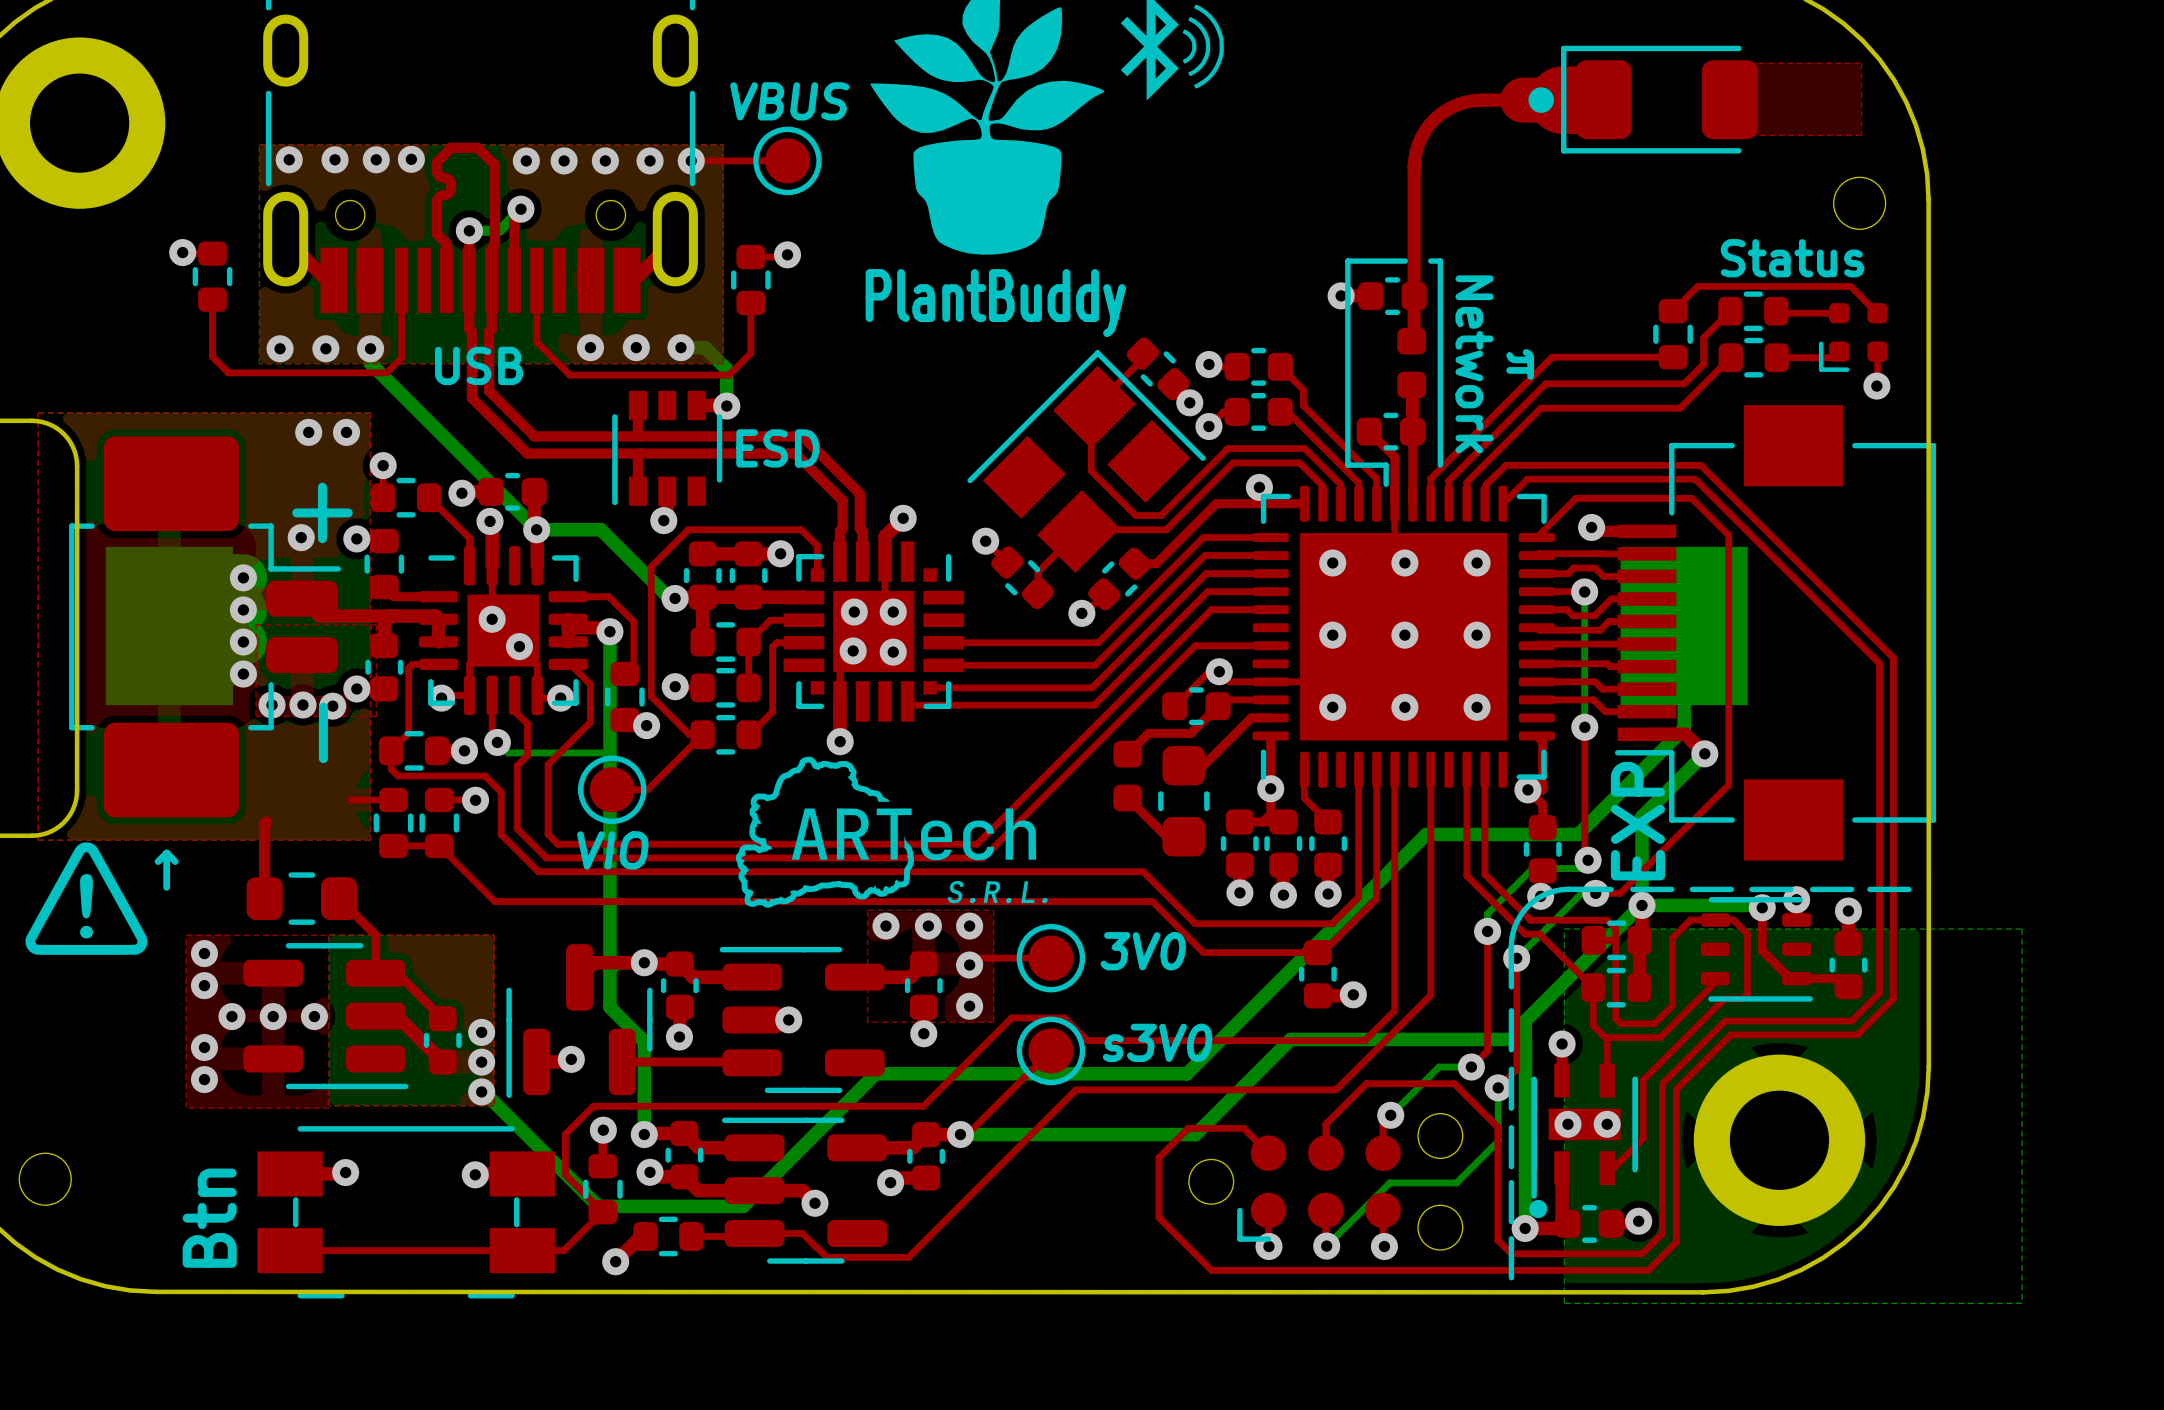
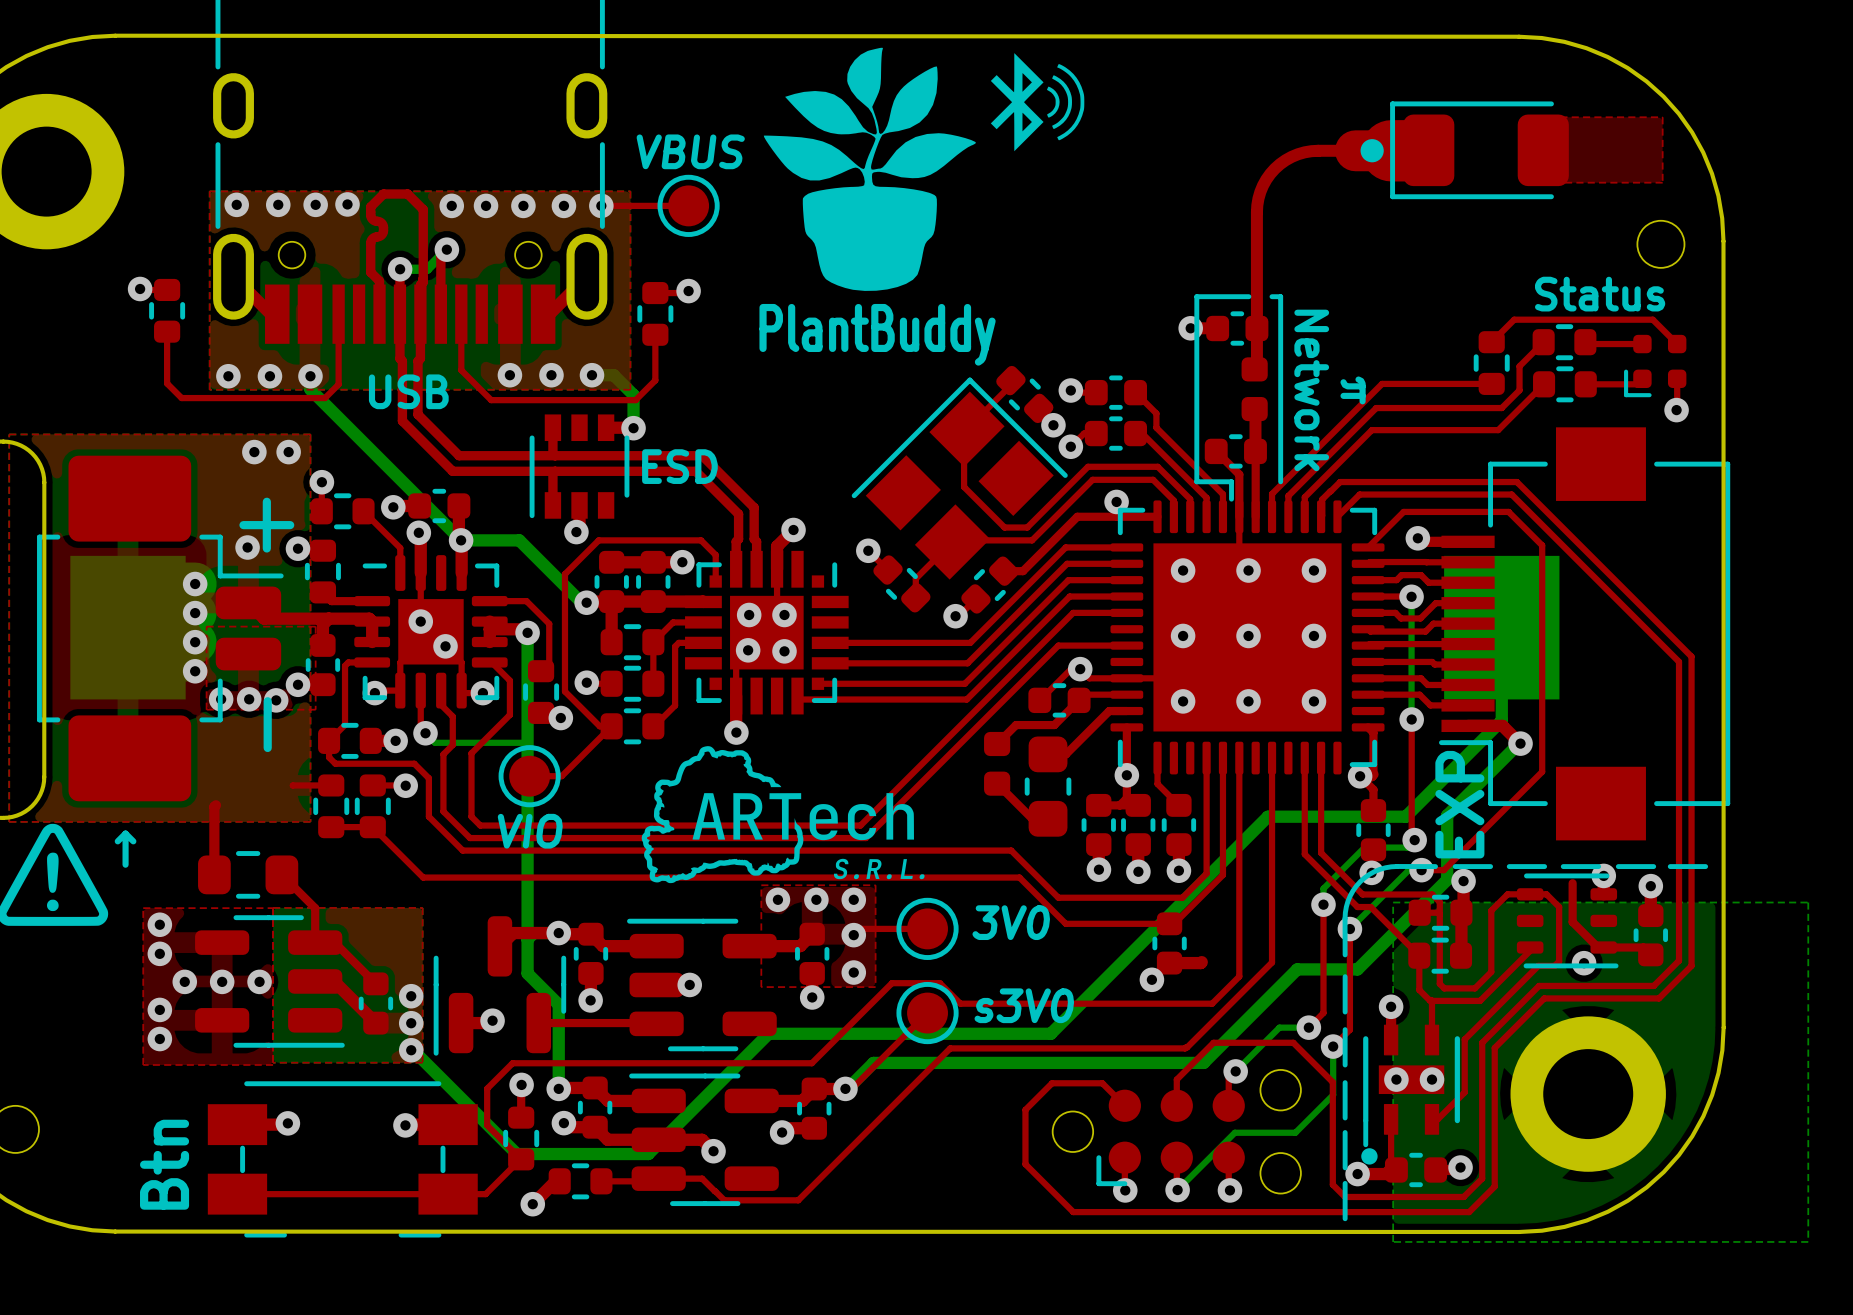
bottom track: (1704, 753) (1641, 816) (1641, 905) -> none
bottom track: (1762, 907) (1759, 905) (1640, 905) (1525, 1021) (1525, 1039) (1290, 1039) (1195, 1134) (960, 1134) -> (1519, 742) (1447, 815) (1447, 879) (1357, 969) (1297, 969) (1203, 1062) (873, 1062) (846, 1089)
via position: (1762, 907) -> (1584, 963)
via position: (1353, 994) -> (1151, 979)
bottom track: (1525, 1039) (1525, 1228) -> none
top track width: thick (1562, 1168) (1562, 1218) -> thin (1391, 1119) (1391, 1164)

